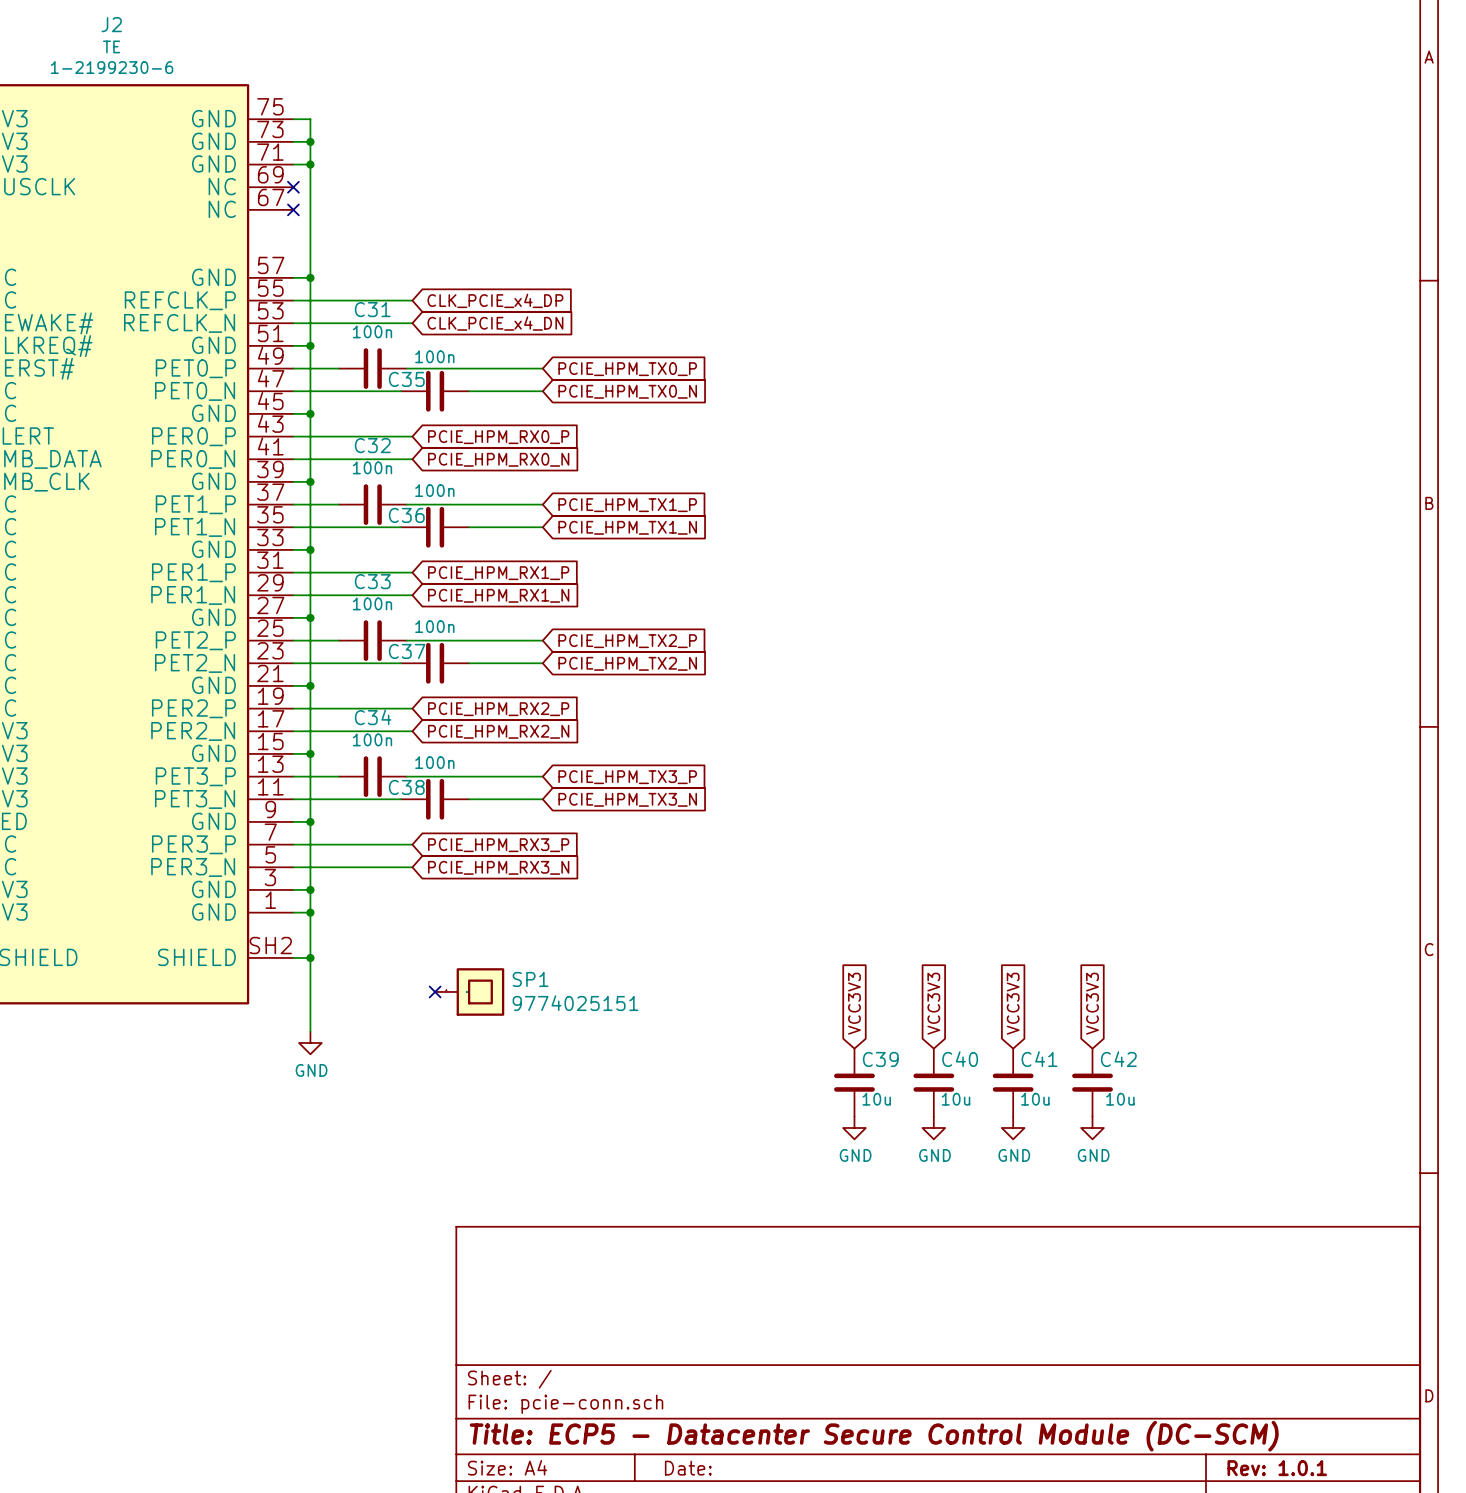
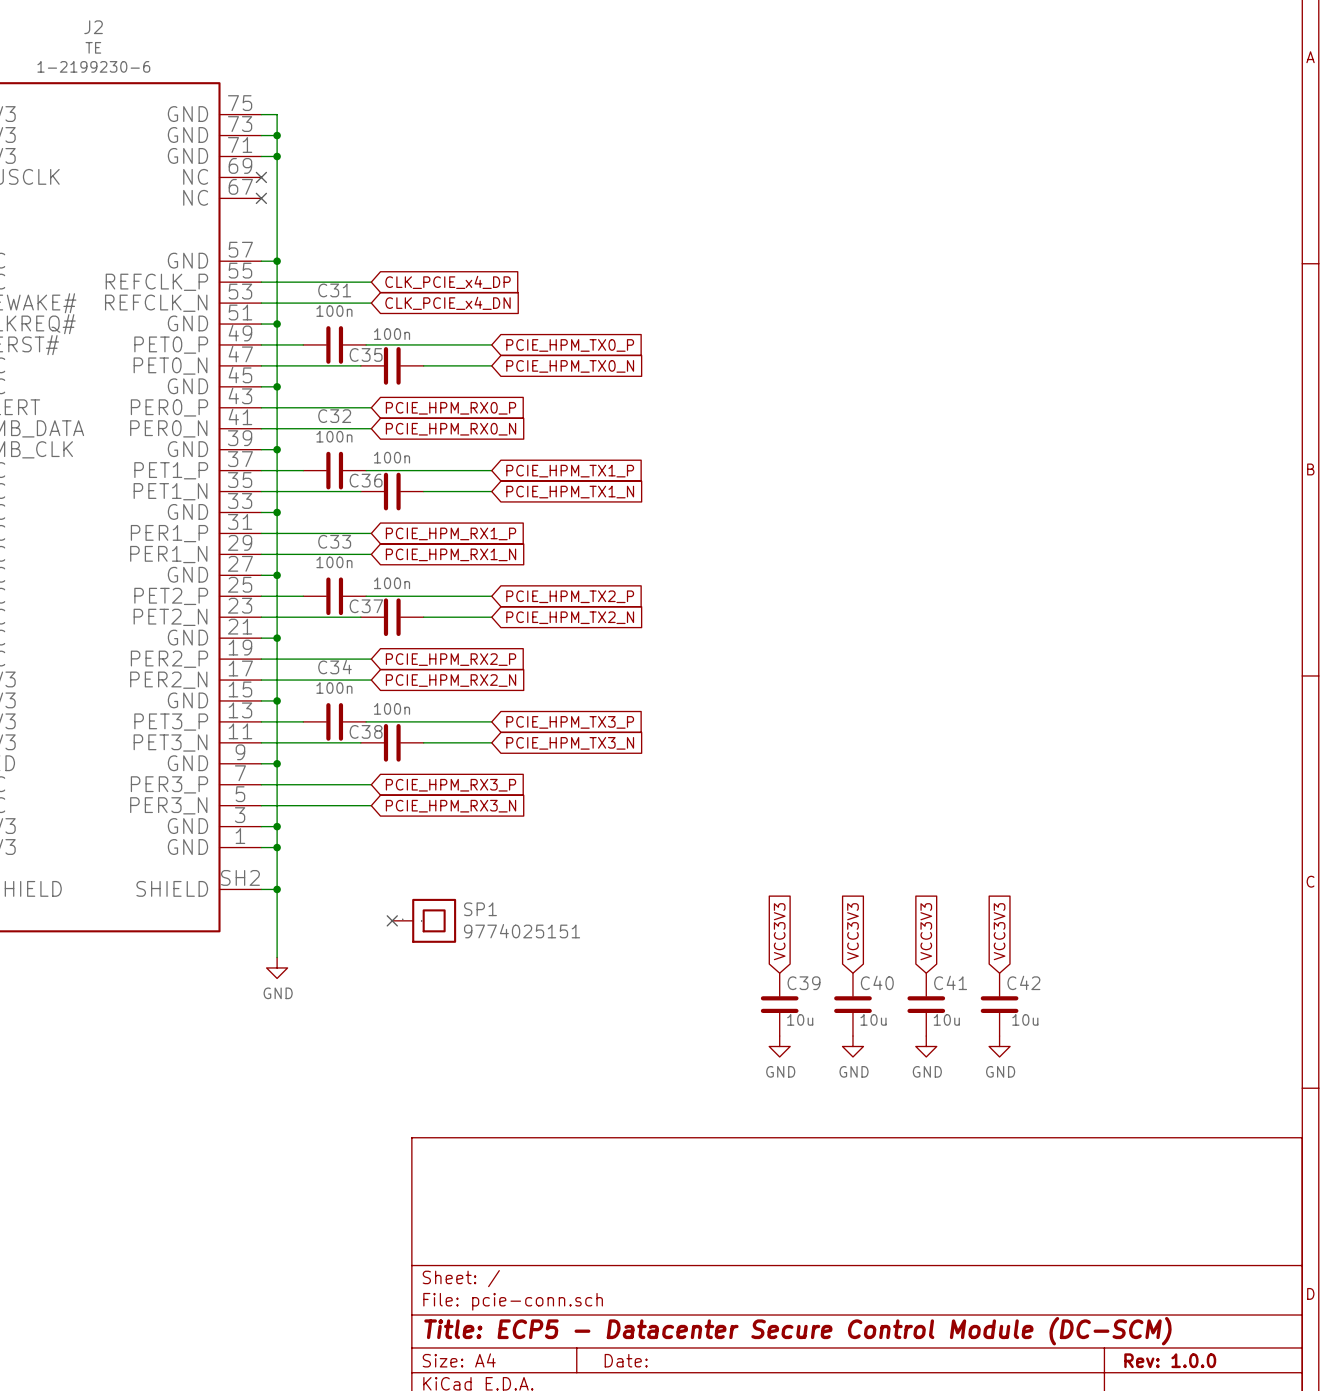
title block: Rev: 1.0.1 (1277, 1468) -> Rev: 1.0.0 (1170, 1360)

